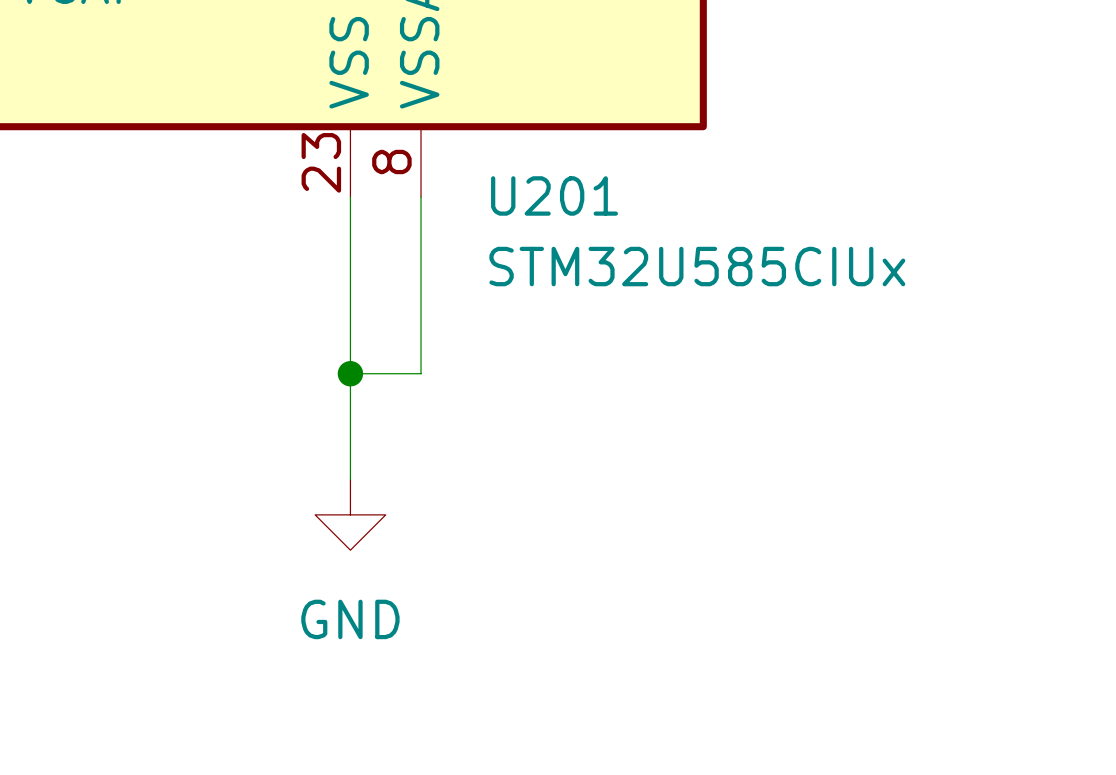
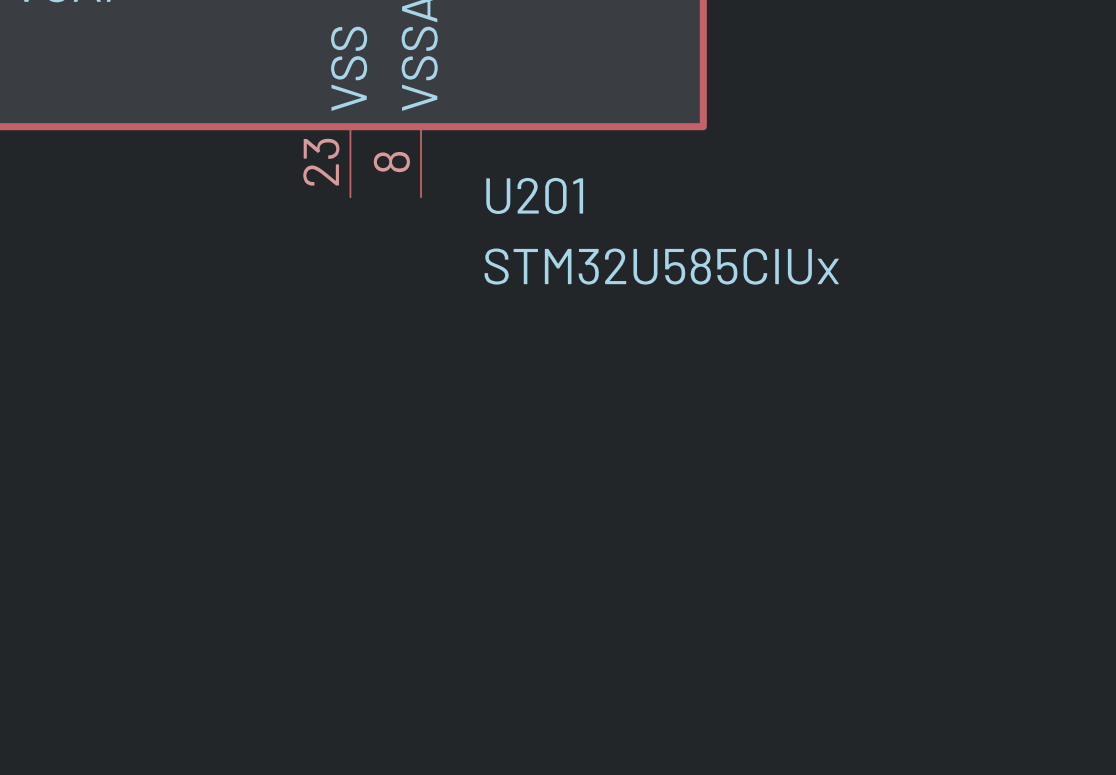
wire: (350, 197) (350, 479) -> none
wire: (421, 197) (421, 373) (350, 373) -> none
junction: (350, 373) -> none
power symbol: GND (350, 514) -> none

